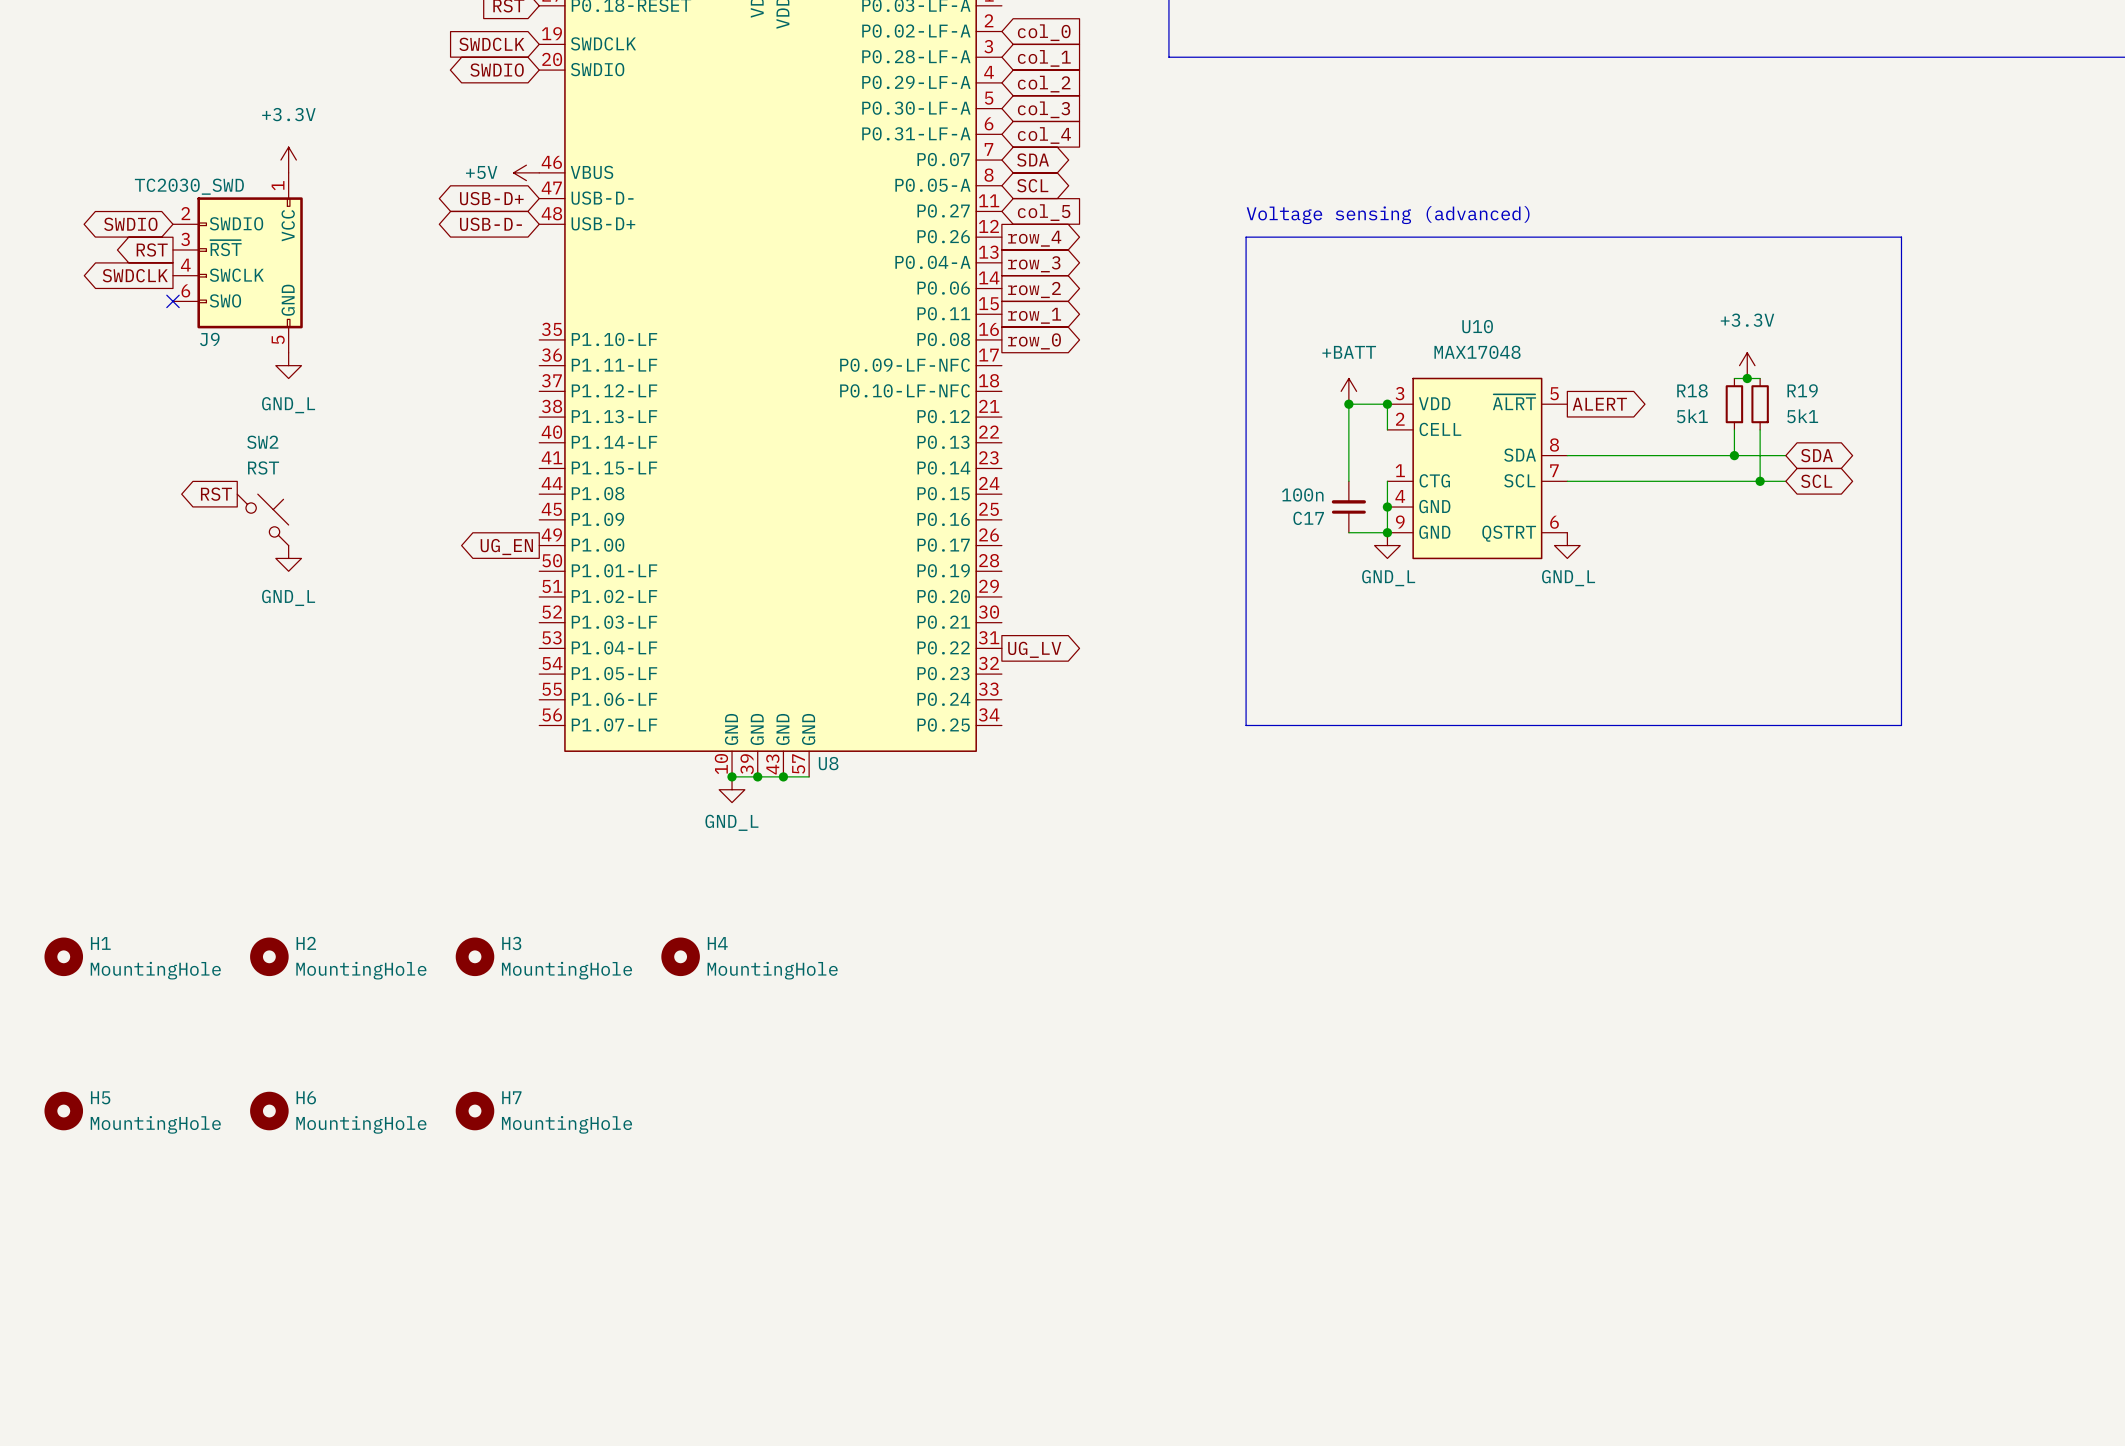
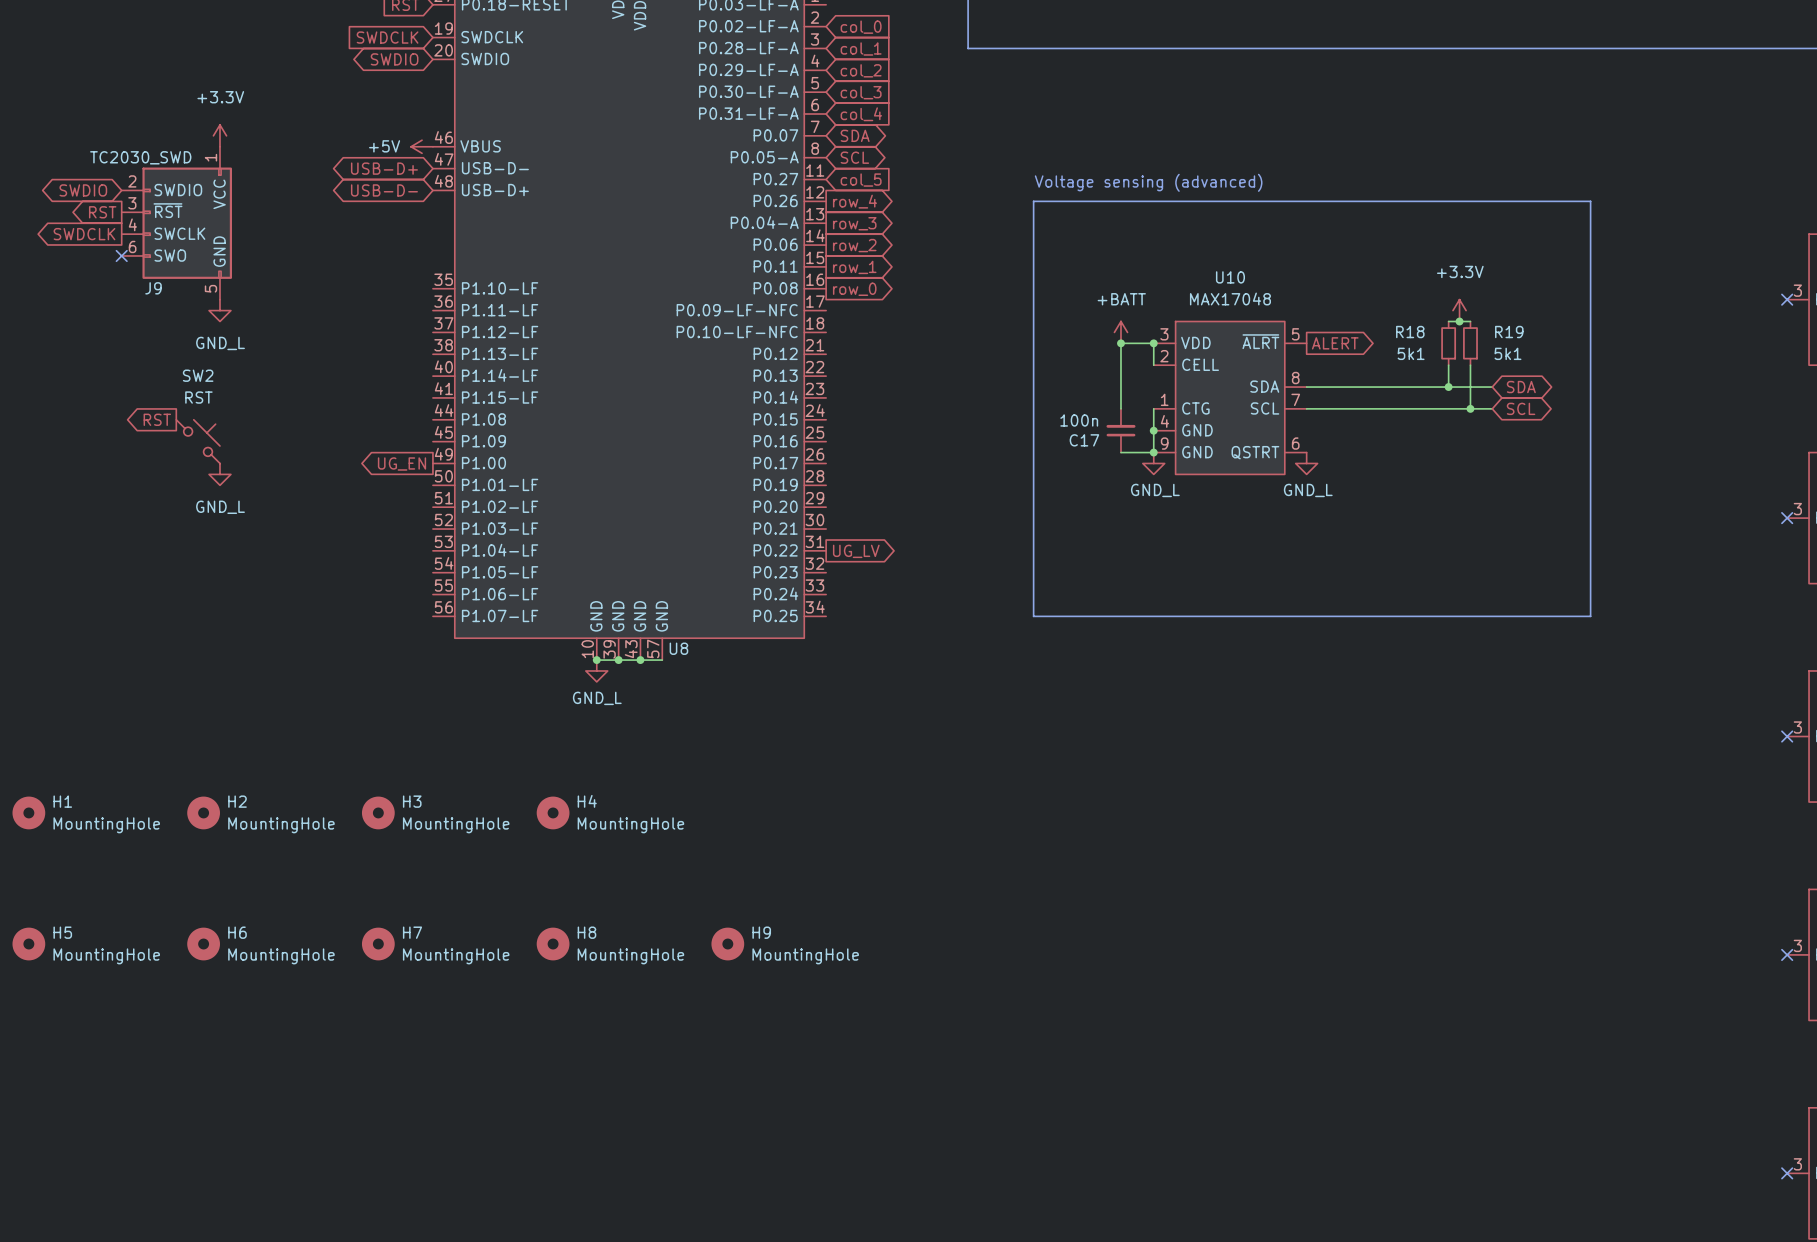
H8: none -> MountingHole (553, 944)
H9: none -> MountingHole (727, 944)

